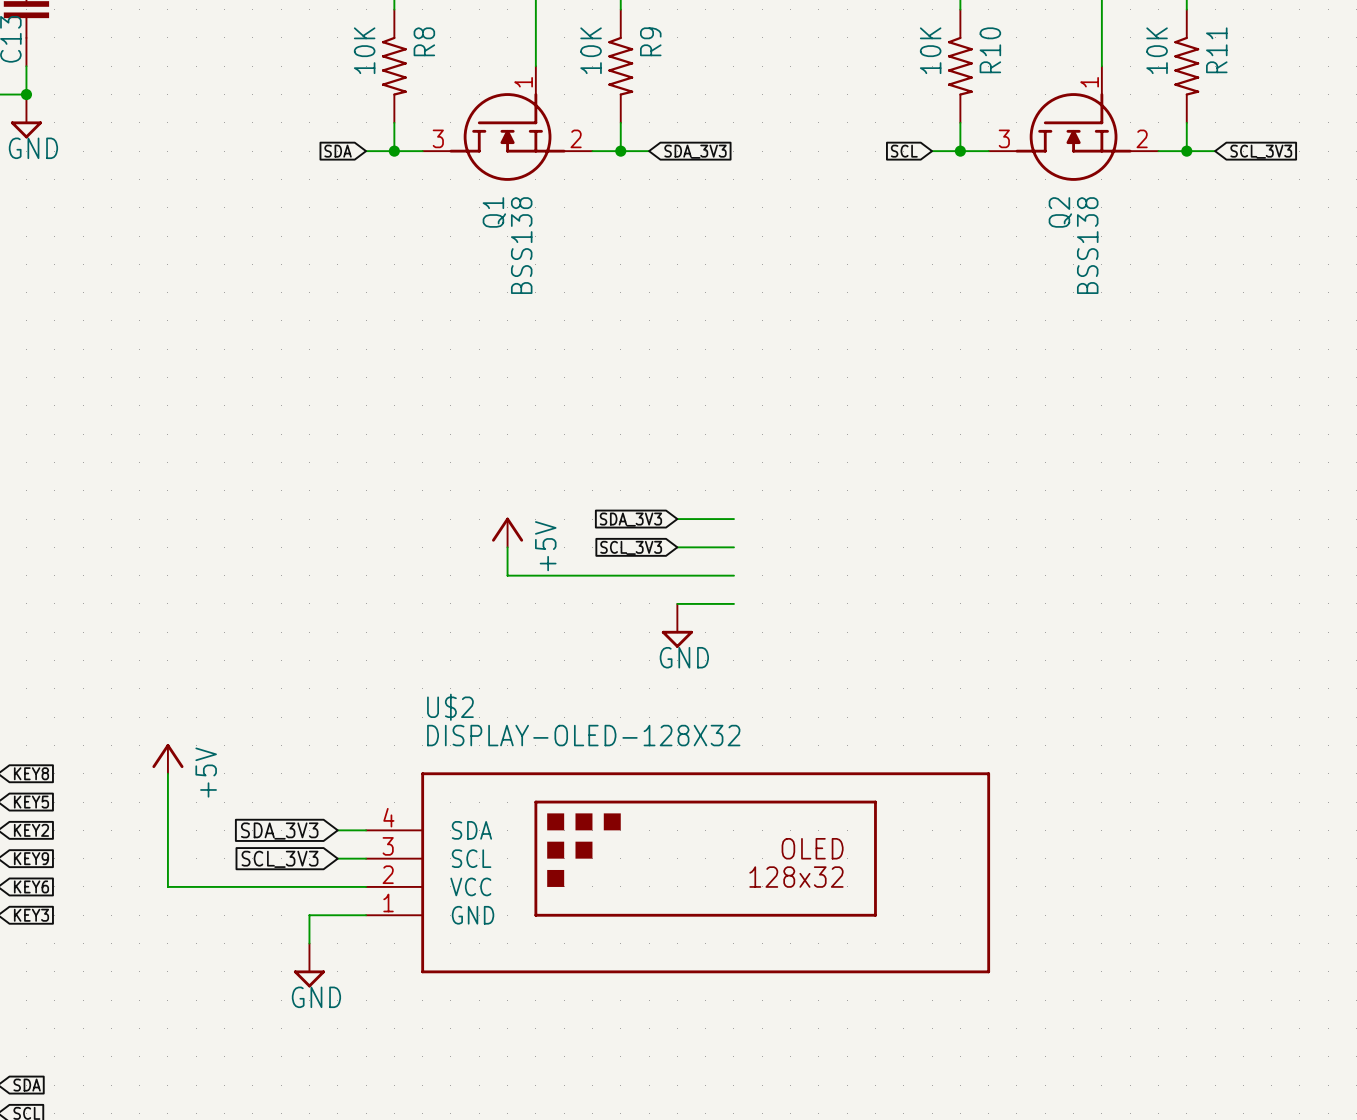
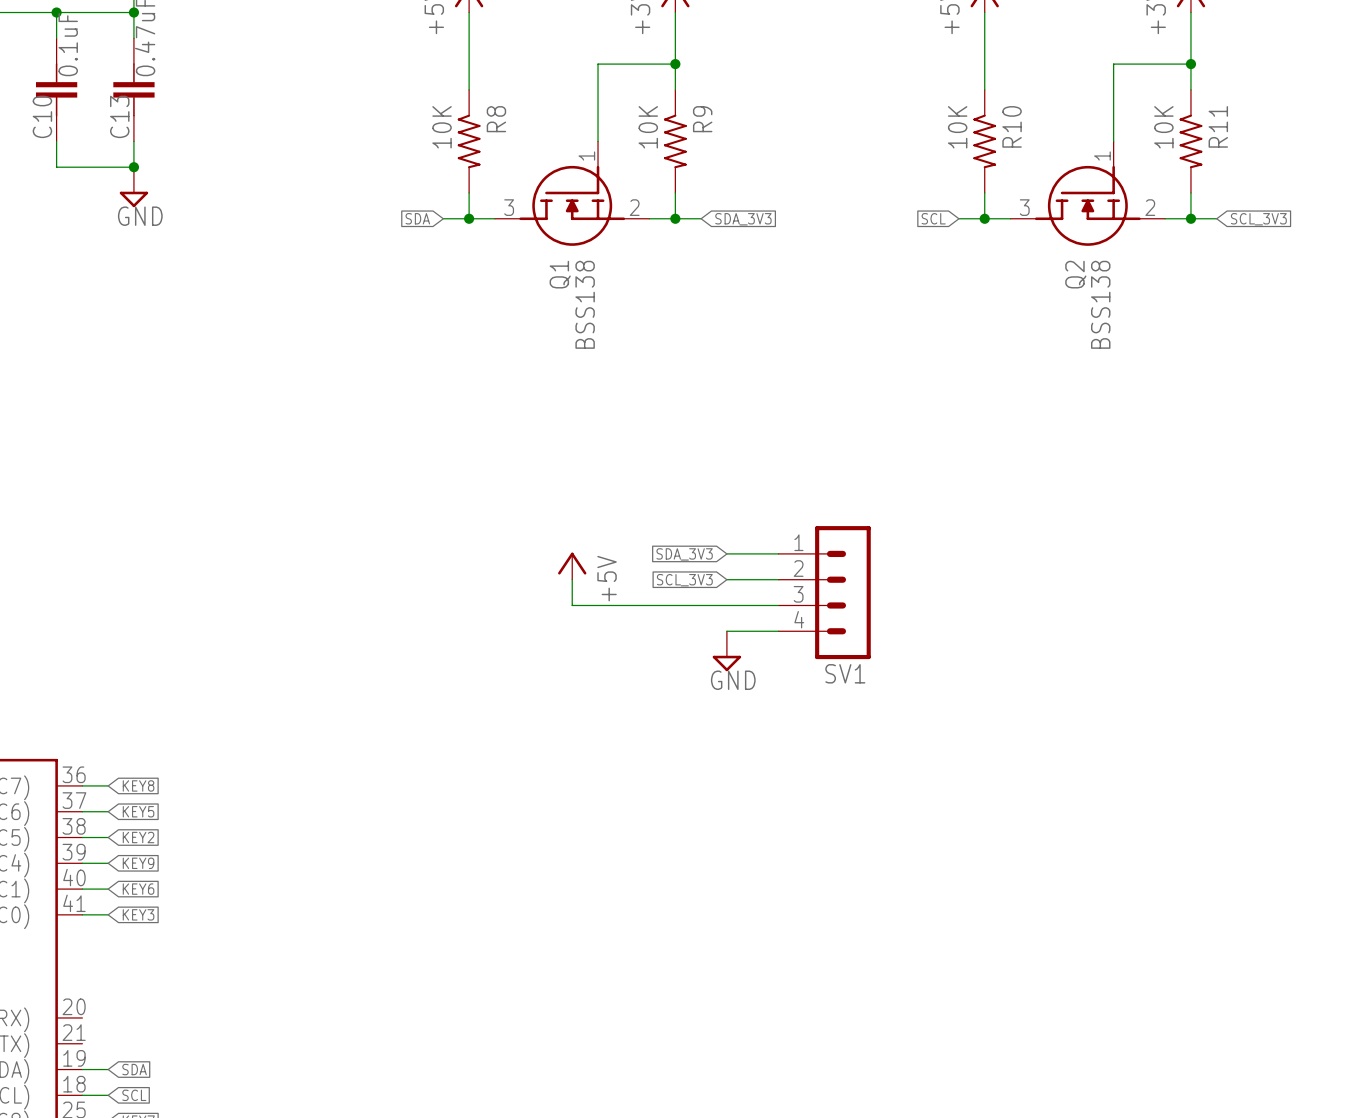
SV1: none -> (824, 592)
power symbol: +5V (167, 758) -> none
wire: (167, 773) (167, 886) (366, 886) -> none
wire: (337, 830) (366, 830) -> none
global label: SDA_3V3 (279, 831) -> none
wire: (337, 858) (366, 858) -> none
global label: SCL_3V3 (280, 859) -> none
U$2: DISPLAY-OLED-128X32 (678, 872) -> none
wire: (366, 915) (309, 915) (309, 943) -> none
power symbol: GND (309, 965) -> none

